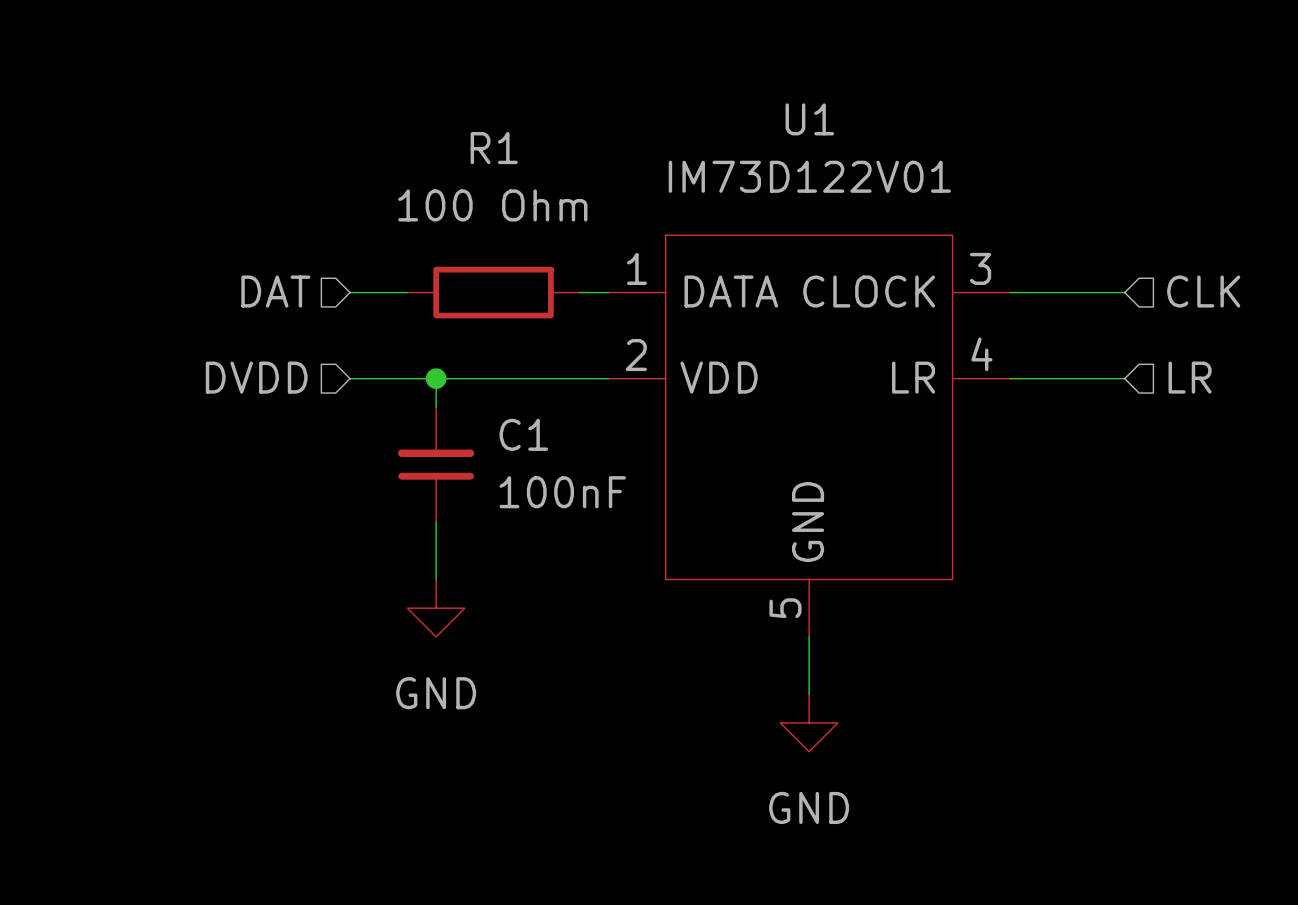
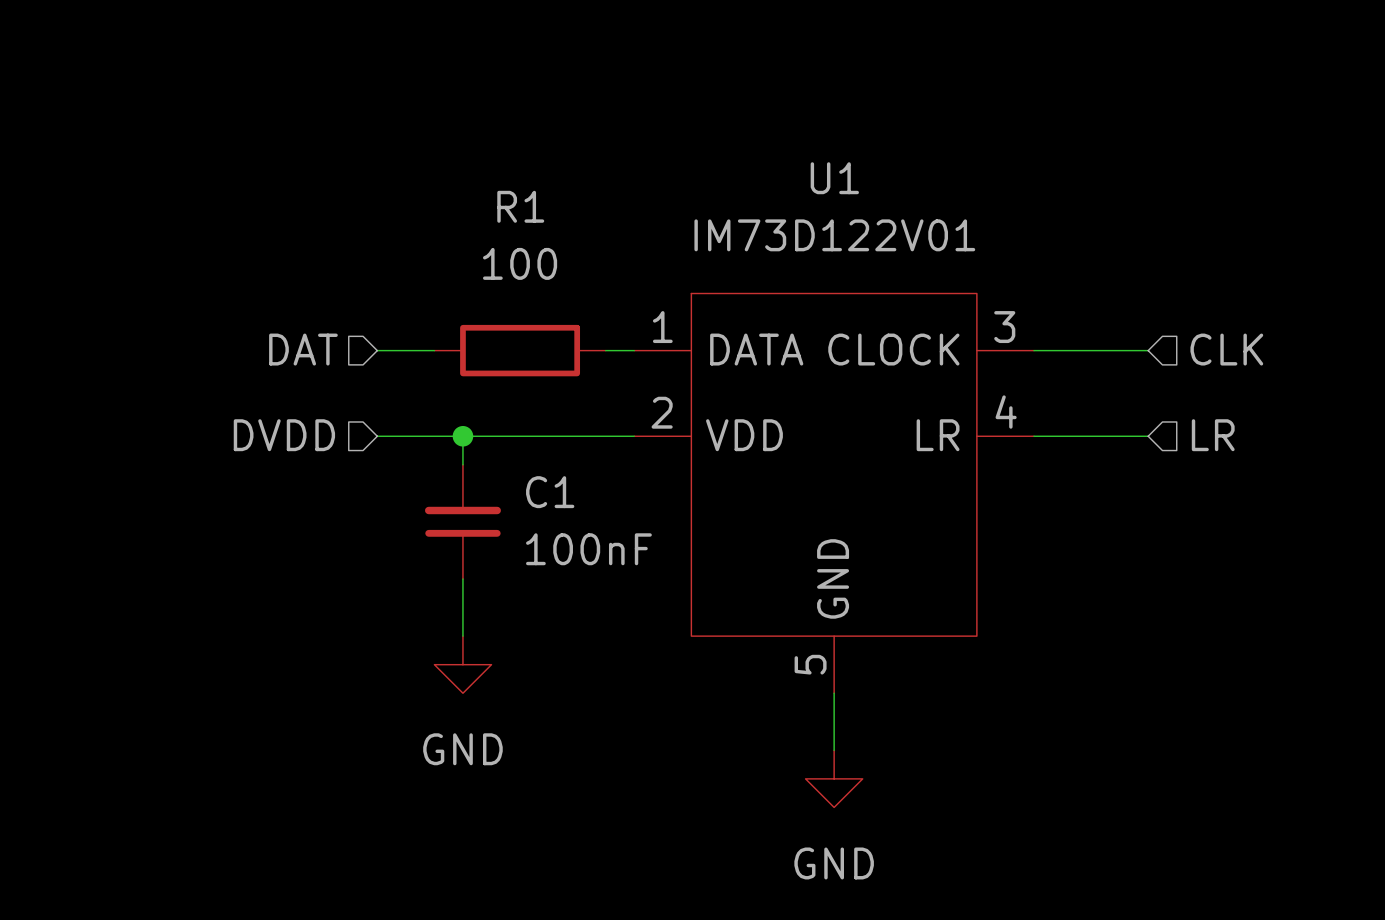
R1 value: 100 Ohm (492, 205) -> 100 (520, 263)

